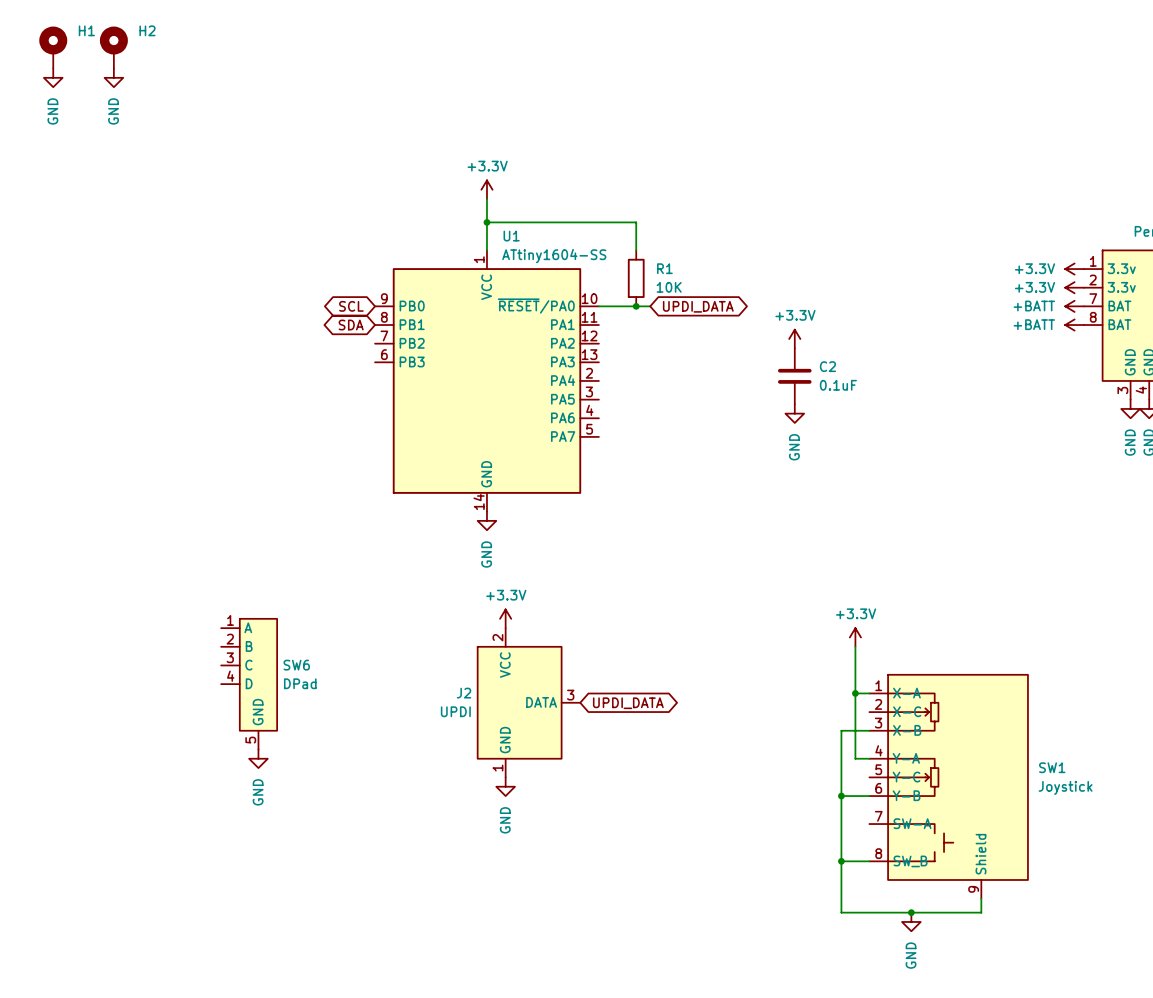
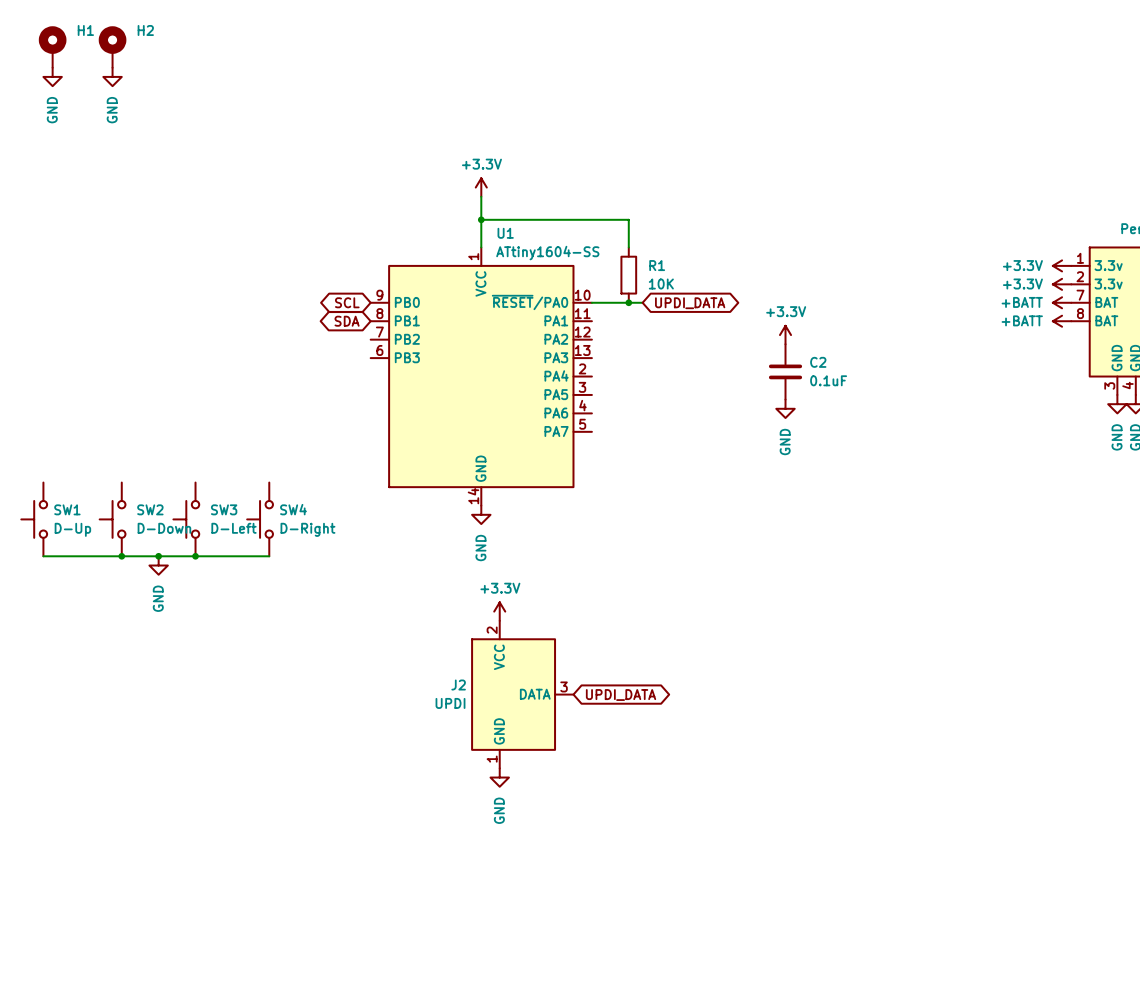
SW2: none -> D-Down (112, 519)
SW3: none -> D-Left (186, 519)
SW4: none -> D-Right (260, 519)
wire: none -> (43, 556) (269, 556)
junction: none -> (121, 556)
junction: none -> (158, 556)
junction: none -> (195, 556)
power symbol: none -> GND (158, 565)
power symbol: +3.3V (855, 637) -> none
wire: (855, 646) (855, 758) (869, 758) -> none
SW1 symbol: [869, 674, 1028, 899] -> [21, 482, 48, 557]
SW6: DPad (249, 684) -> none
wire: (855, 693) (869, 693) -> none
junction: (855, 693) -> none
wire: (869, 730) (841, 730) (841, 912) (981, 912) (981, 898) -> none
power symbol: GND (258, 758) -> none
SW1 name position: SW1 (1052, 767) -> SW1 (67, 509)
SW1 value: Joystick (1065, 787) -> D-Up (72, 529)
wire: (841, 796) (869, 796) -> none
junction: (841, 796) -> none
wire: (841, 861) (869, 861) -> none
junction: (841, 861) -> none
junction: (911, 912) -> none
power symbol: GND (911, 921) -> none

